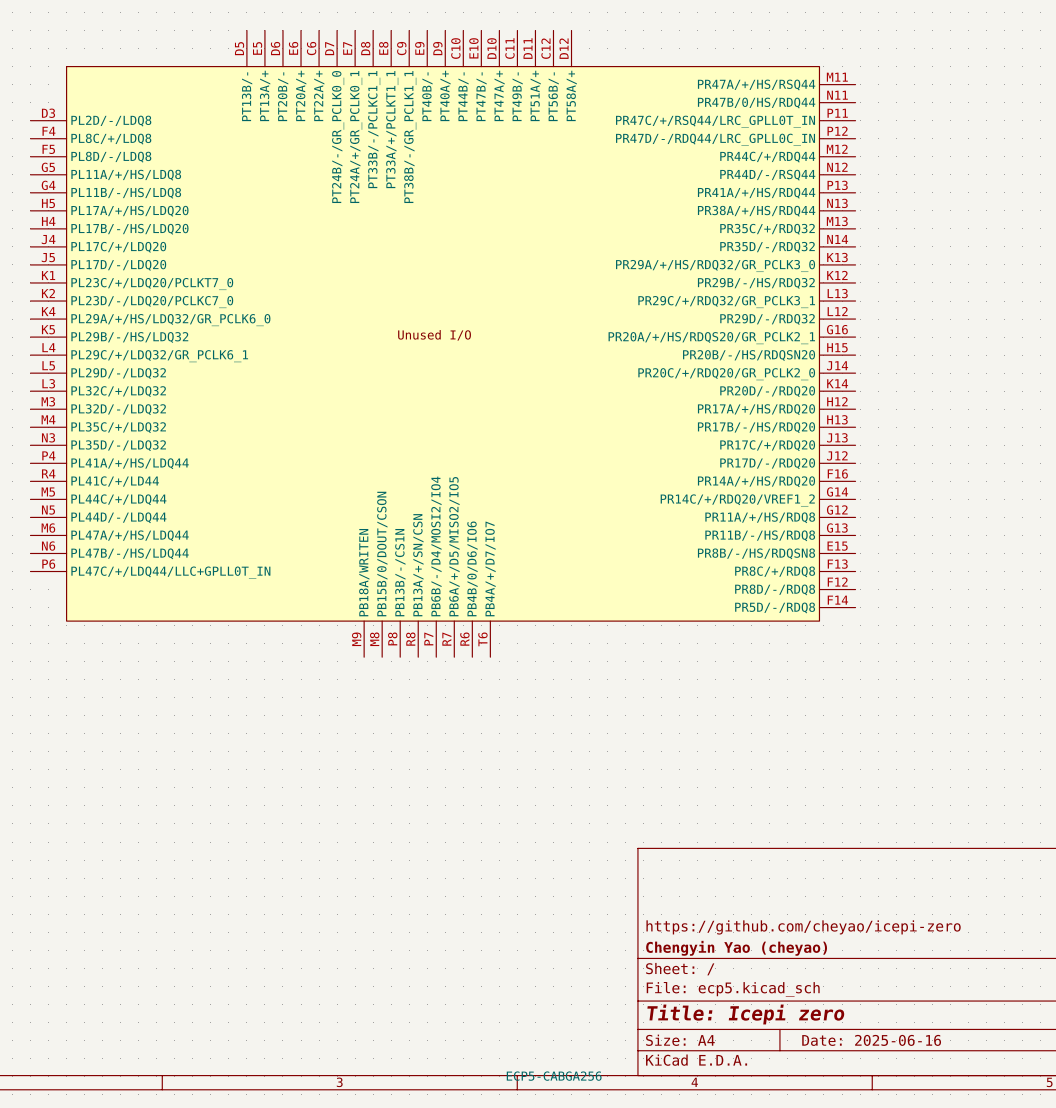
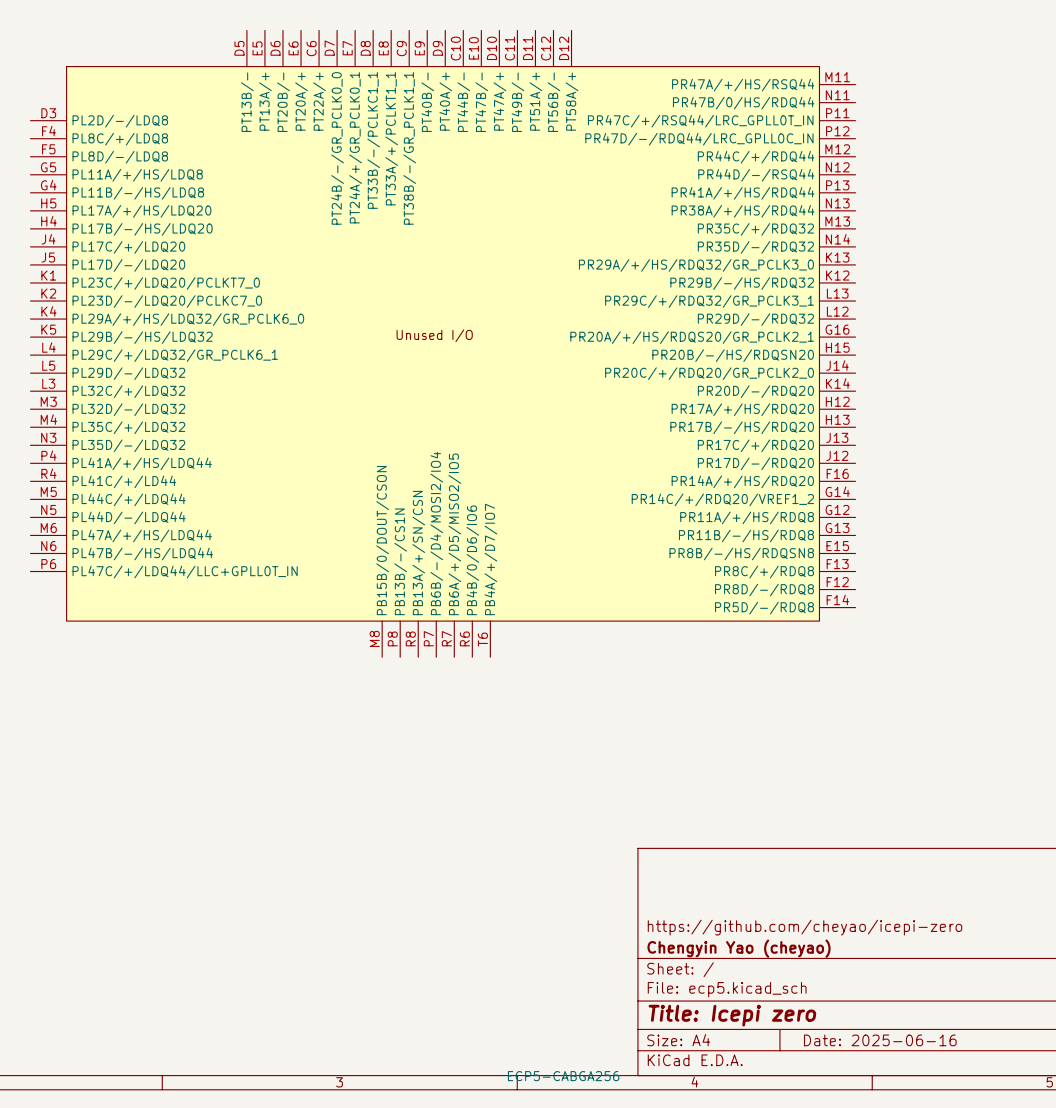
part symbol: [30, 30, 856, 658] -> [30, 30, 856, 658]

